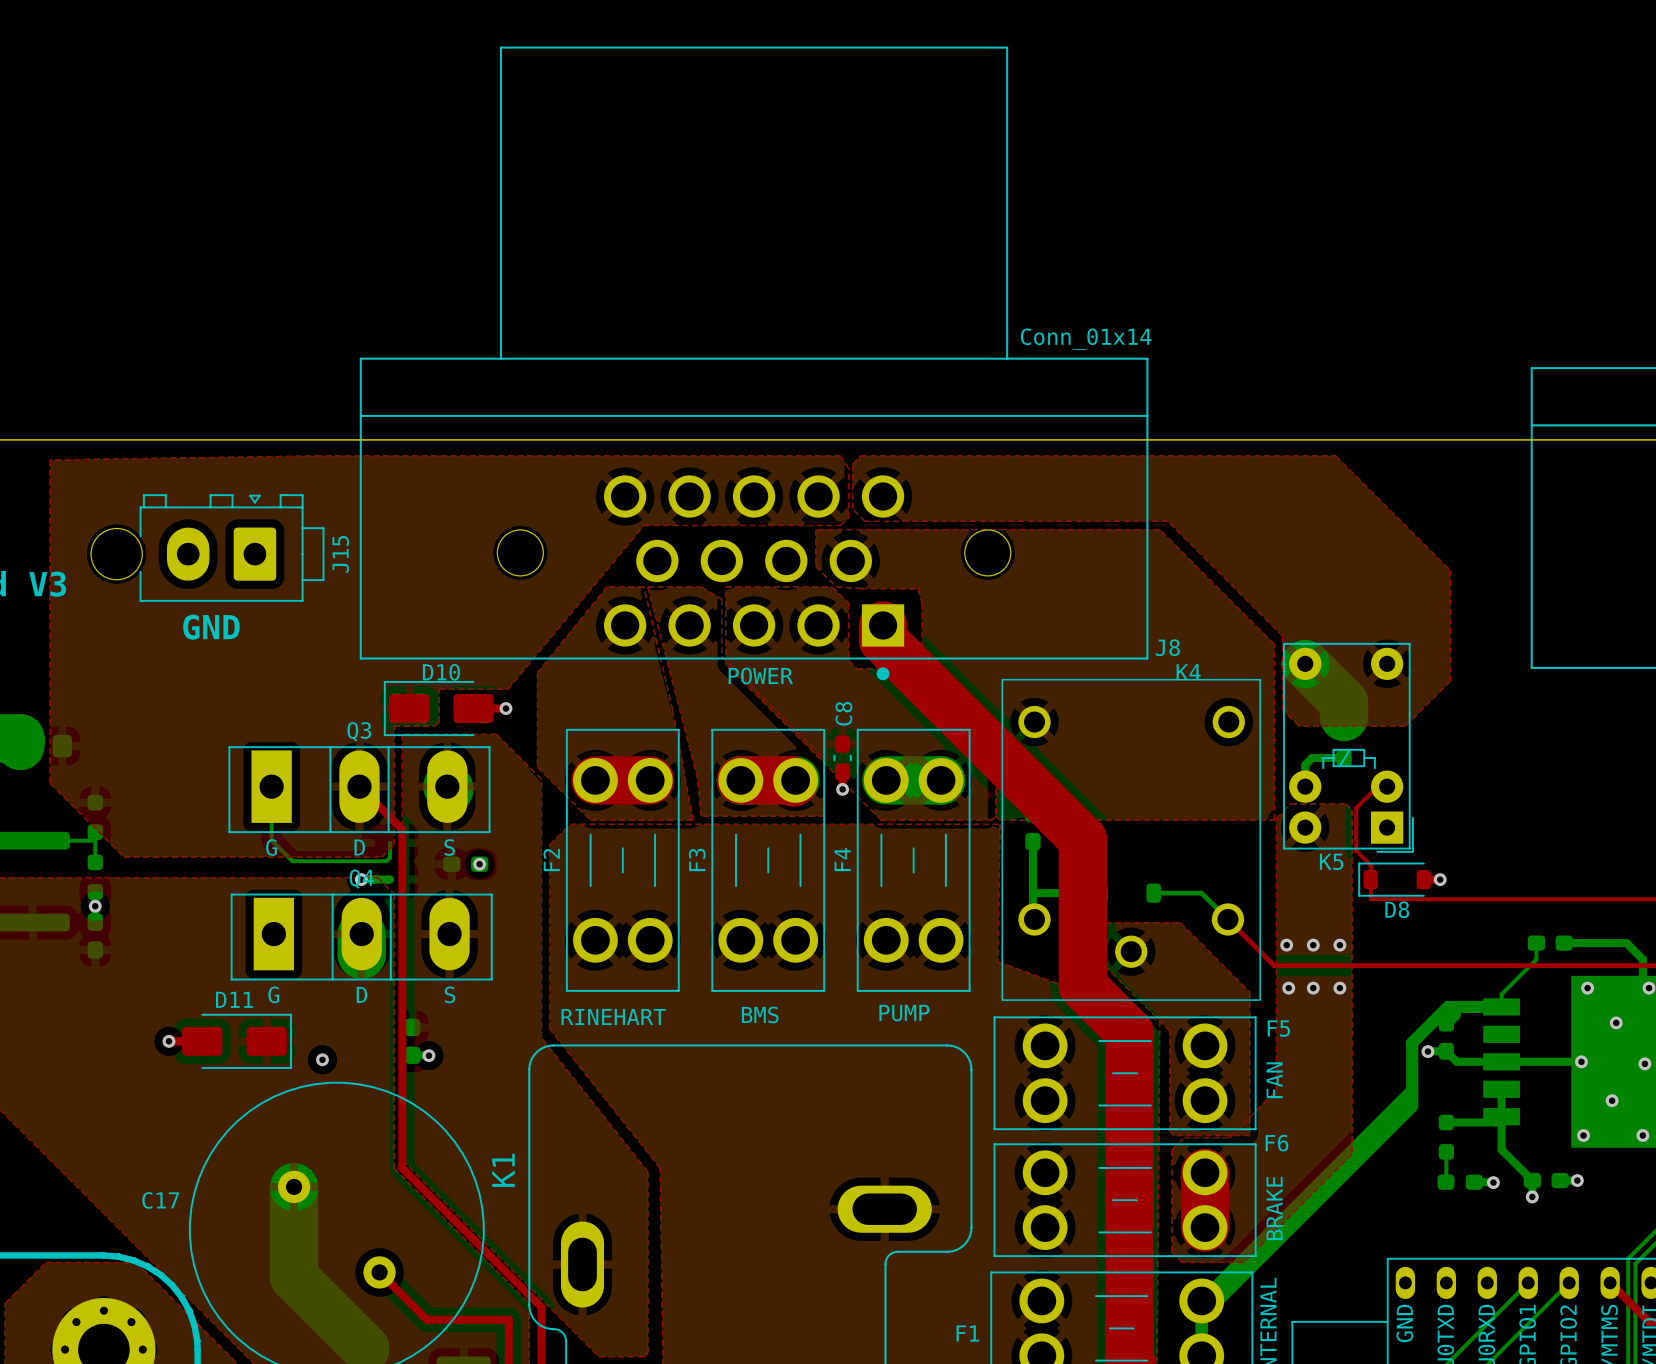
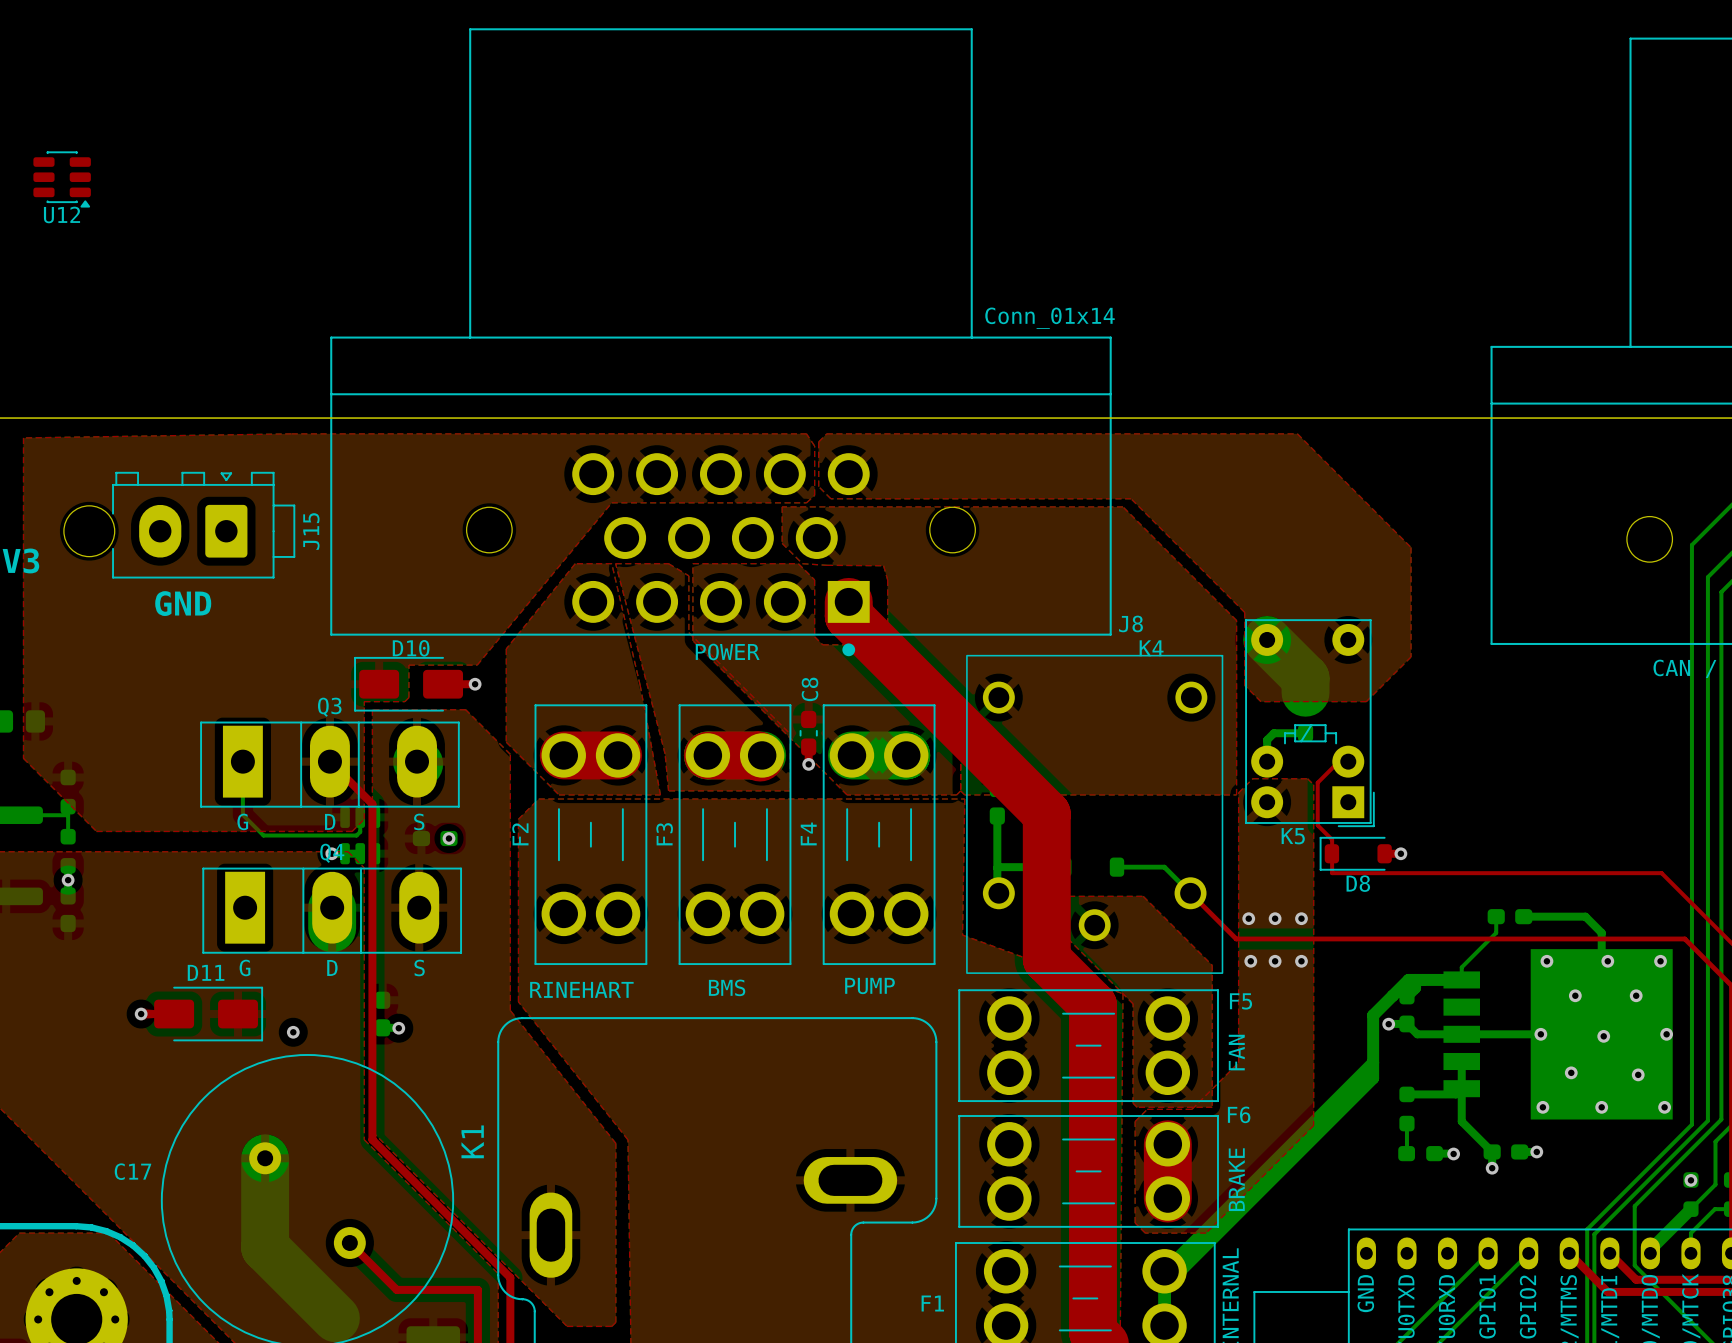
U12: none -> (62, 179)
part: none -> (360, 835)

